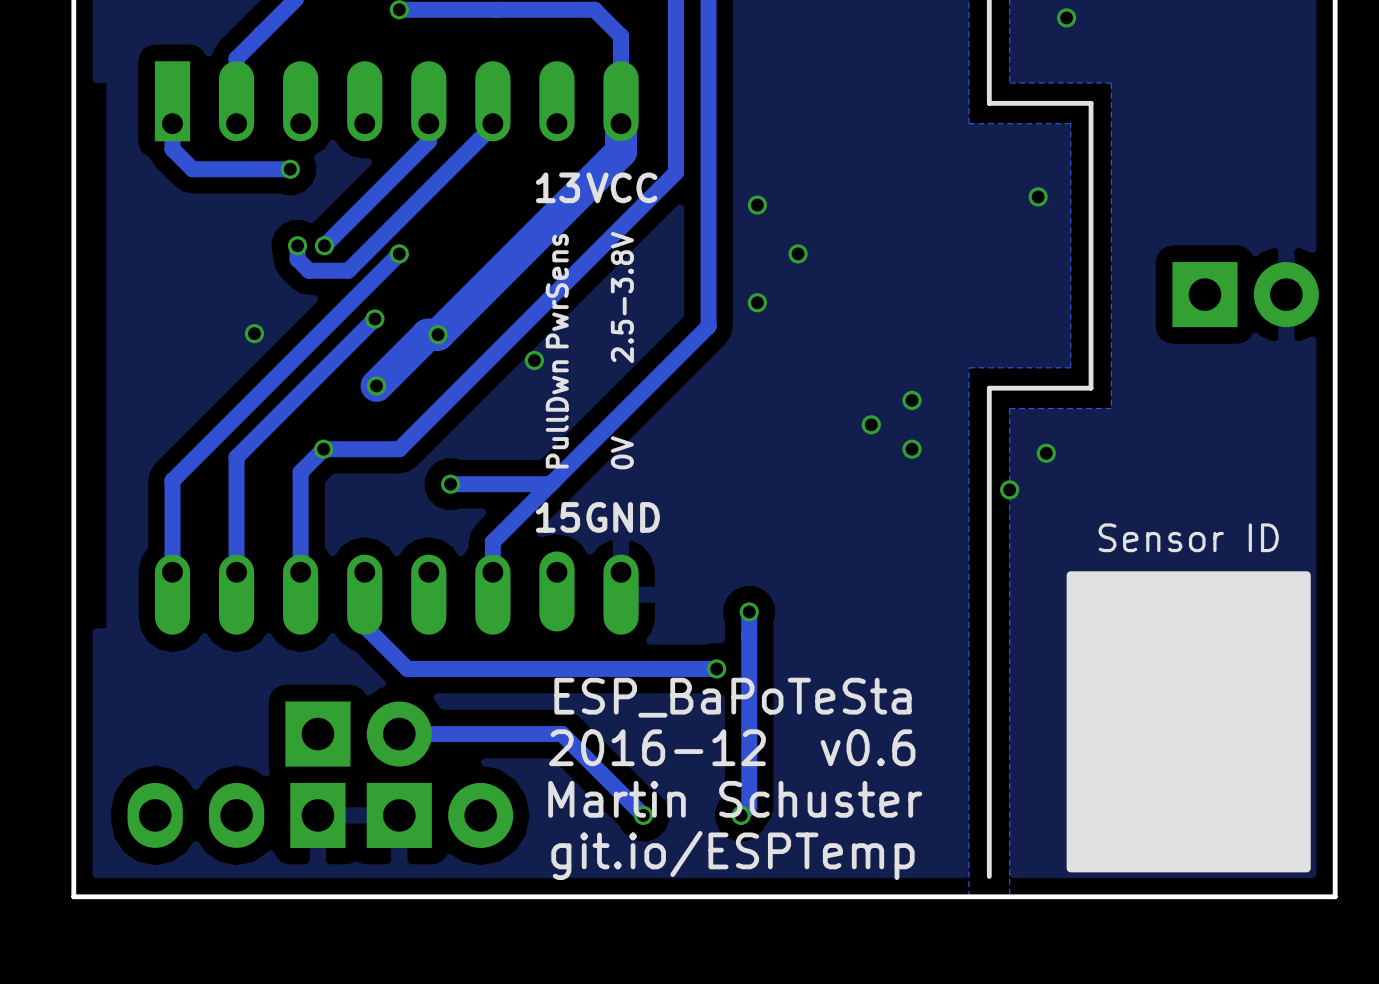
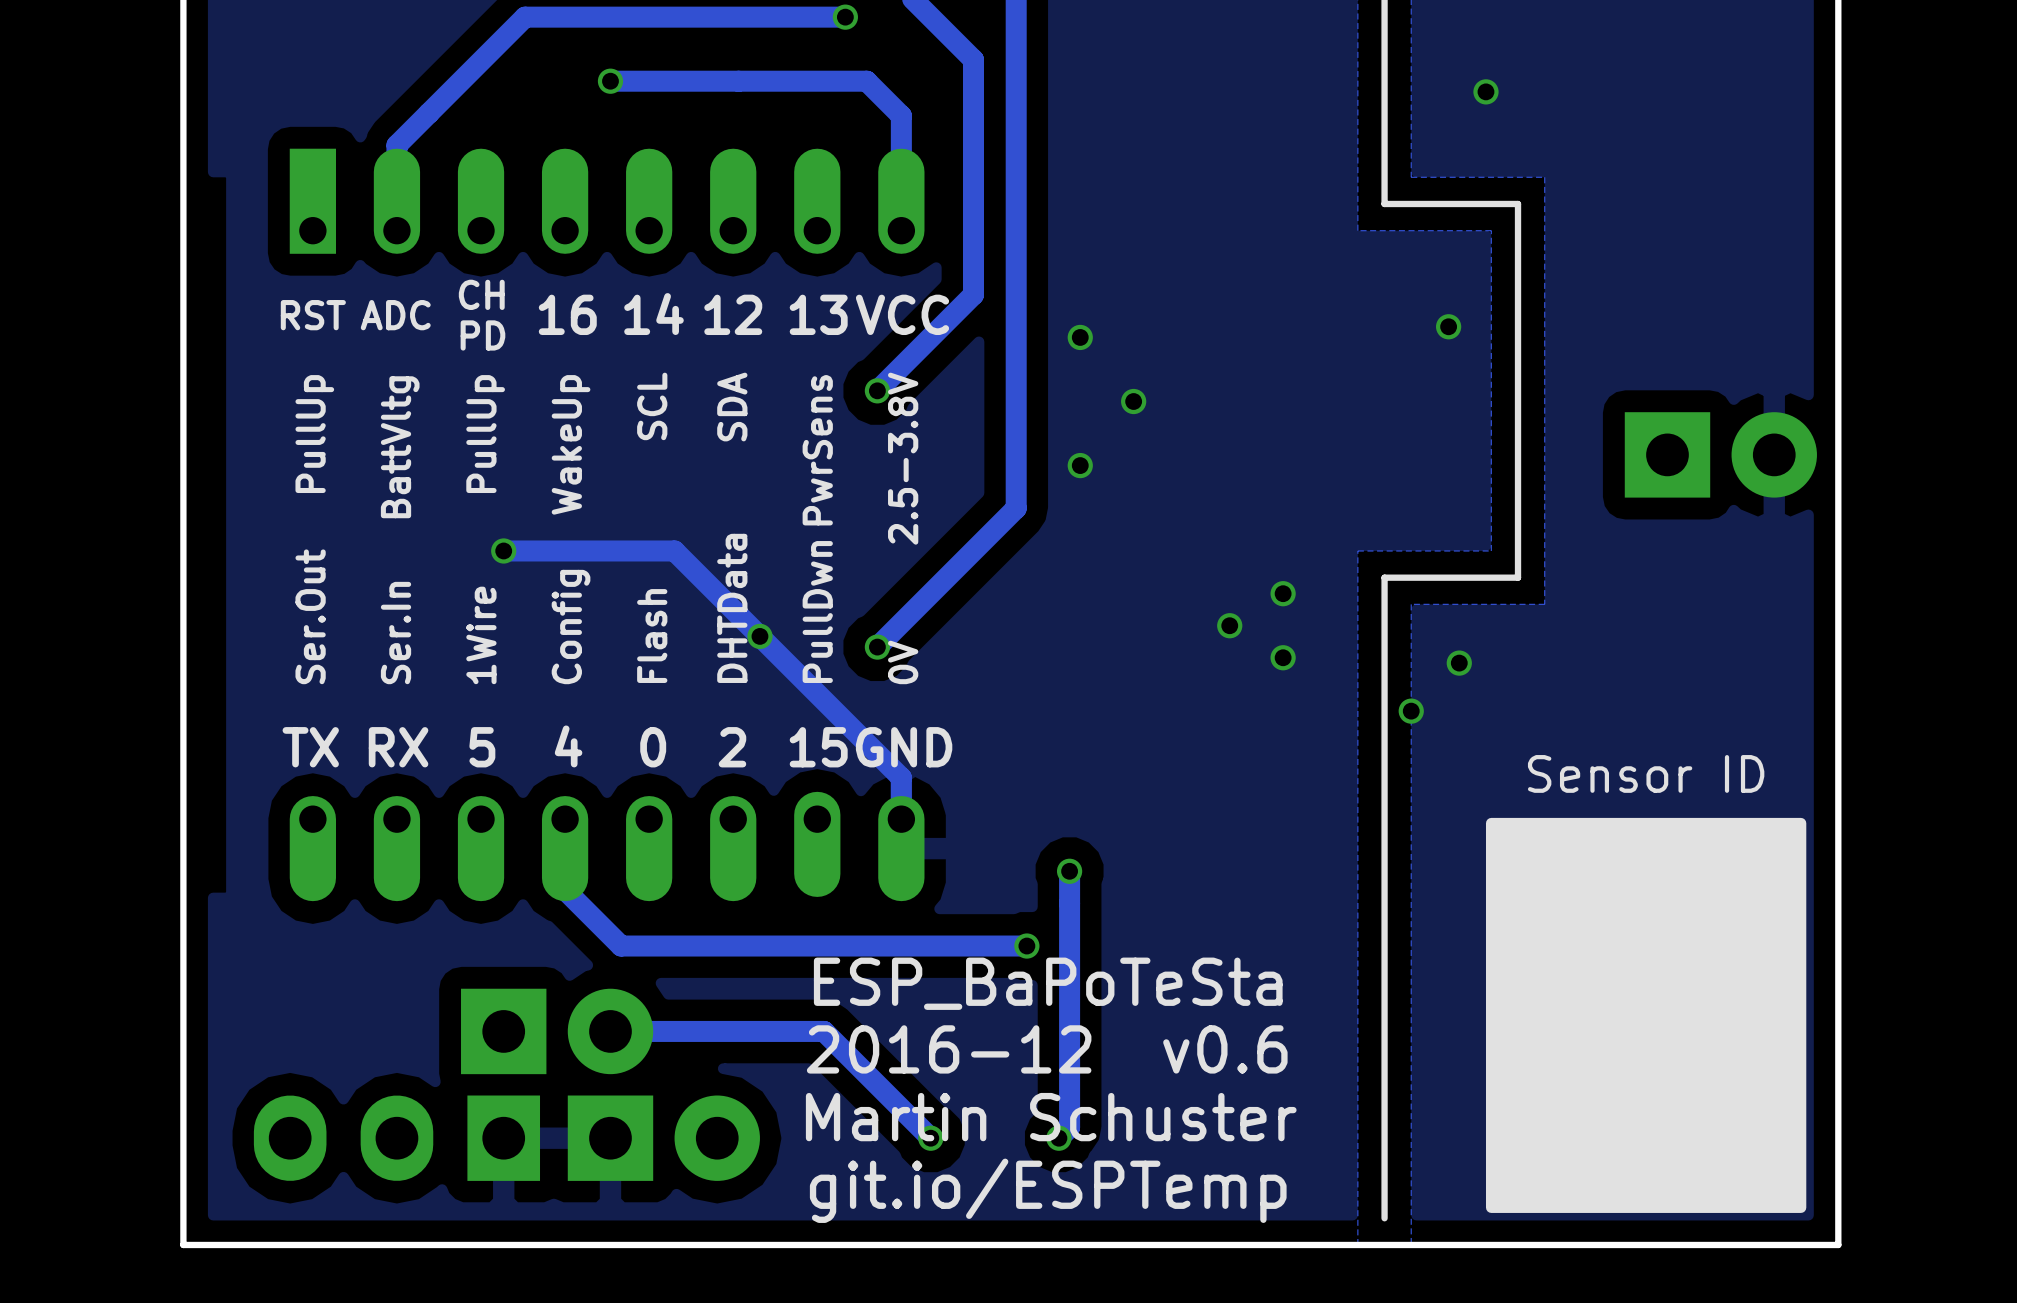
track: (172, 123) (172, 149) (192, 169) (290, 169) -> none
track: (428, 123) (428, 141) (324, 245) -> none
track: (492, 123) (492, 126) (348, 270) (308, 270) (297, 259) (297, 245) -> none
track: (621, 123) (621, 151) (438, 334) (427, 334) (376, 385) -> none
via: (290, 169) -> none
text: none -> CH (481, 294)
text: none -> 16 (567, 314)
text: none -> 14 (653, 314)
text: none -> 12 (733, 314)
text: none -> RST (313, 315)
text: none -> ADC (395, 315)
text: none -> PD (482, 335)
via: (297, 245) -> none
via: (324, 245) -> none
track: (602, 245) (399, 449) (323, 449) (300, 472) (300, 572) -> none
via: none -> (877, 390)
track: (399, 253) (172, 480) (172, 572) -> none
via: (399, 253) -> none
text: none -> SCL (652, 406)
text: none -> SDA (732, 407)
text: none -> PullUp (314, 434)
text: none -> PullUp (485, 434)
text: none -> WakeUp (571, 444)
text: none -> BattVltg (400, 447)
track: (374, 319) (236, 457) (236, 572) -> none
via: (374, 319) -> none
track: (708, 326) (492, 542) (492, 567) -> (1016, 496) (1016, 508) (877, 647)
via: (254, 333) -> none
via: (438, 334) -> none
via: (534, 360) -> none
track: none -> (503, 550) (674, 550) (901, 777) (901, 819)
via: none -> (503, 550)
via: (376, 385) -> none
text: none -> DHTData (732, 608)
text: none -> Ser.Out (310, 616)
text: none -> Config (571, 627)
text: none -> Ser.In (396, 633)
text: none -> 1Wire (481, 635)
text: none -> Flash (652, 636)
via: none -> (759, 636)
via: none -> (877, 647)
via: (323, 449) -> none
via: (450, 484) -> none
track: (550, 484) (450, 484) -> none
text: none -> 4 (568, 746)
text: none -> TX (310, 747)
text: none -> RX (398, 747)
text: none -> 5 (482, 747)
text: none -> 0 (653, 747)
text: none -> 2 (732, 747)

